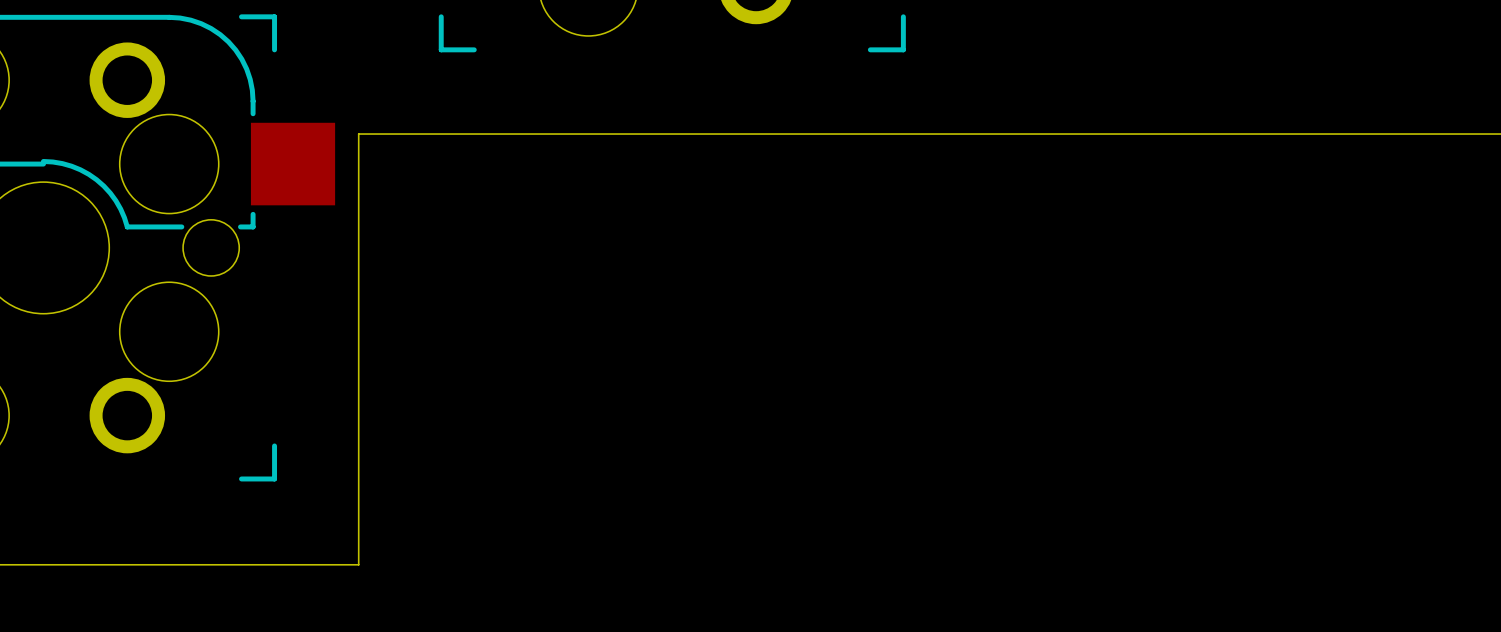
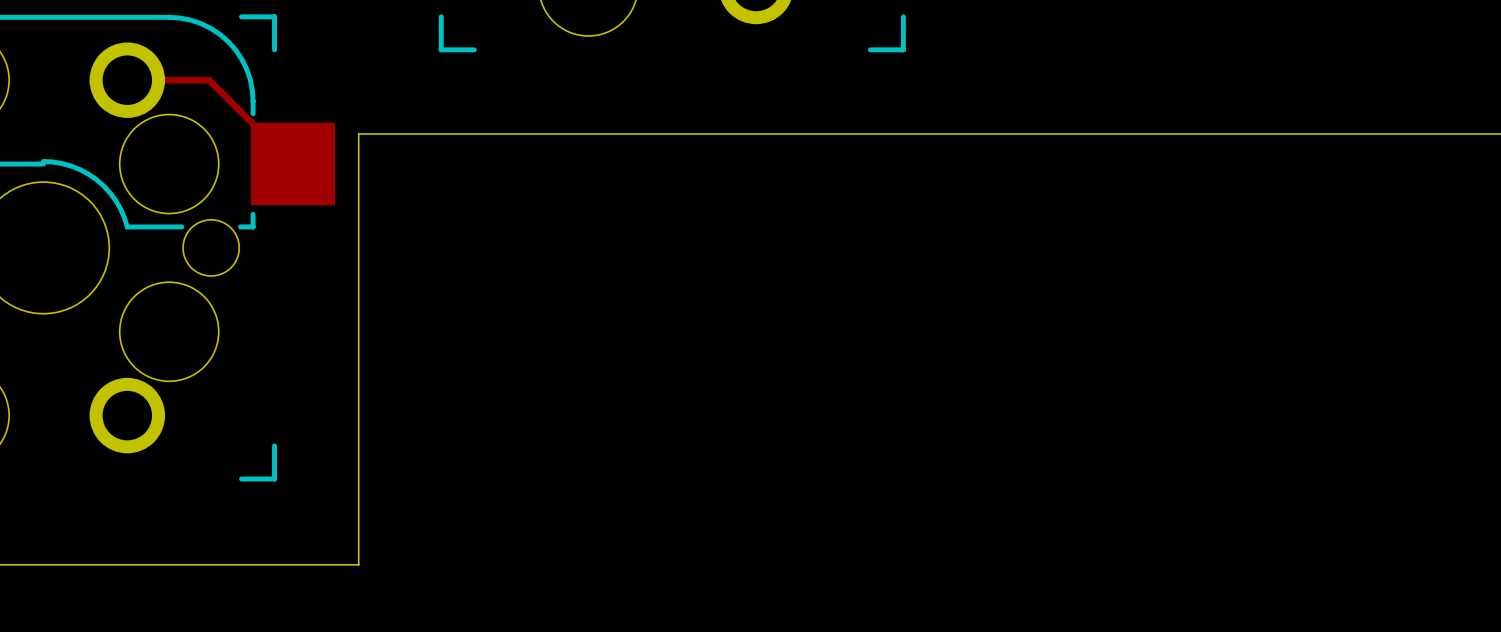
track: none -> (127, 80) (209, 80) (293, 164)

